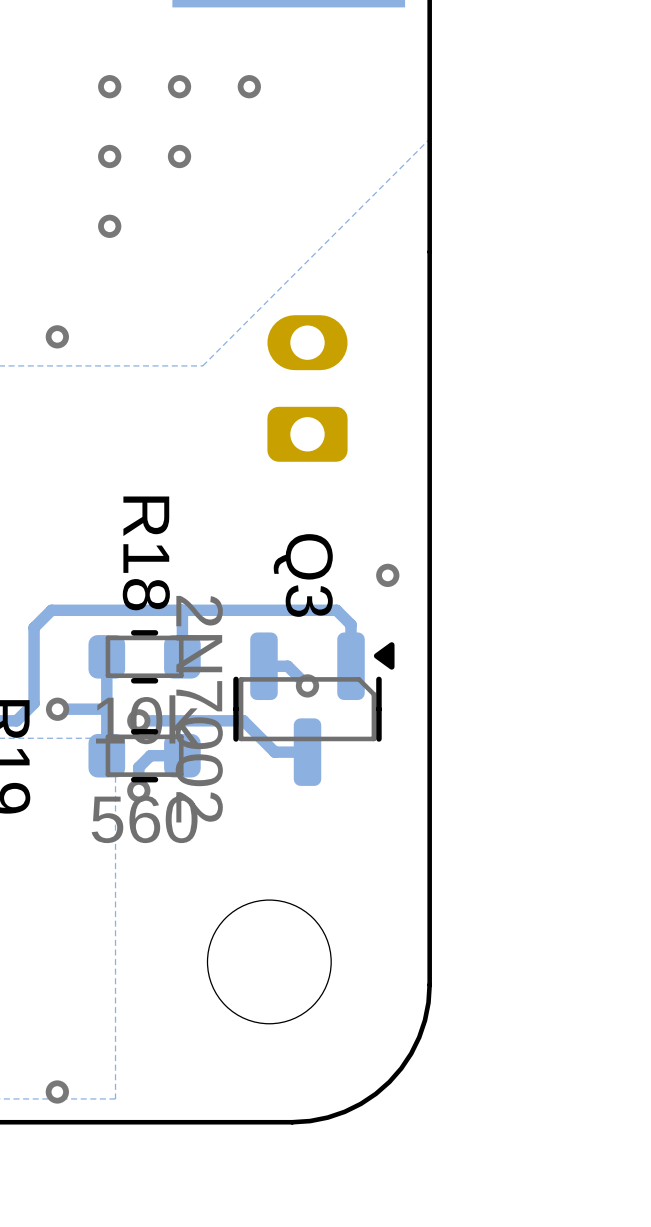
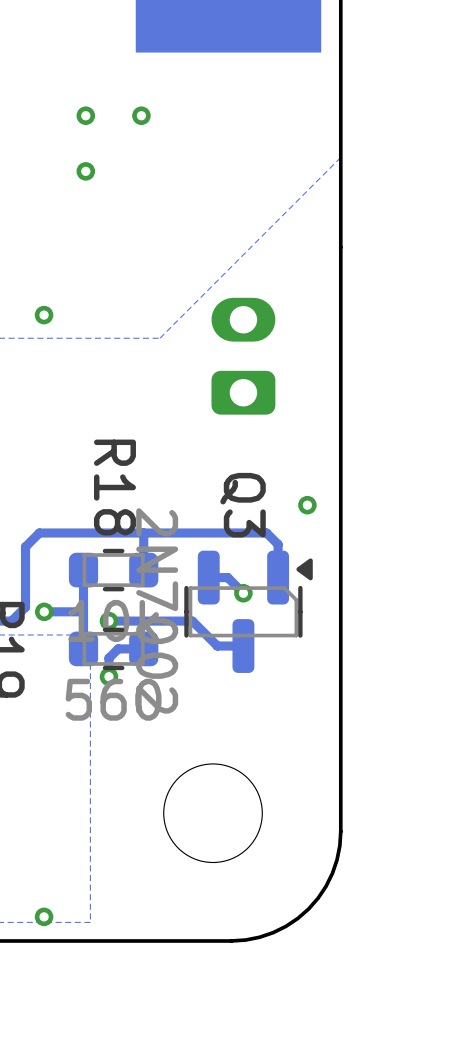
via: (249, 86) -> none
via: (179, 156) -> none
via: (109, 226) -> none

